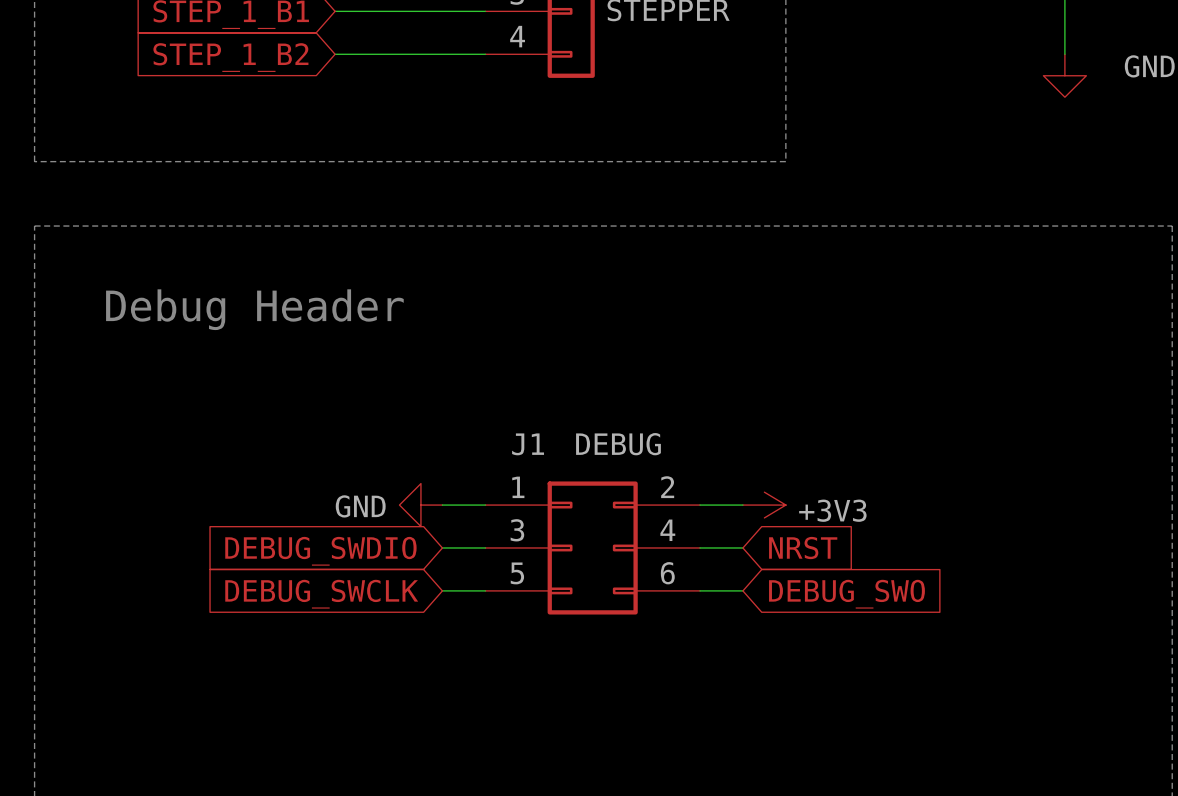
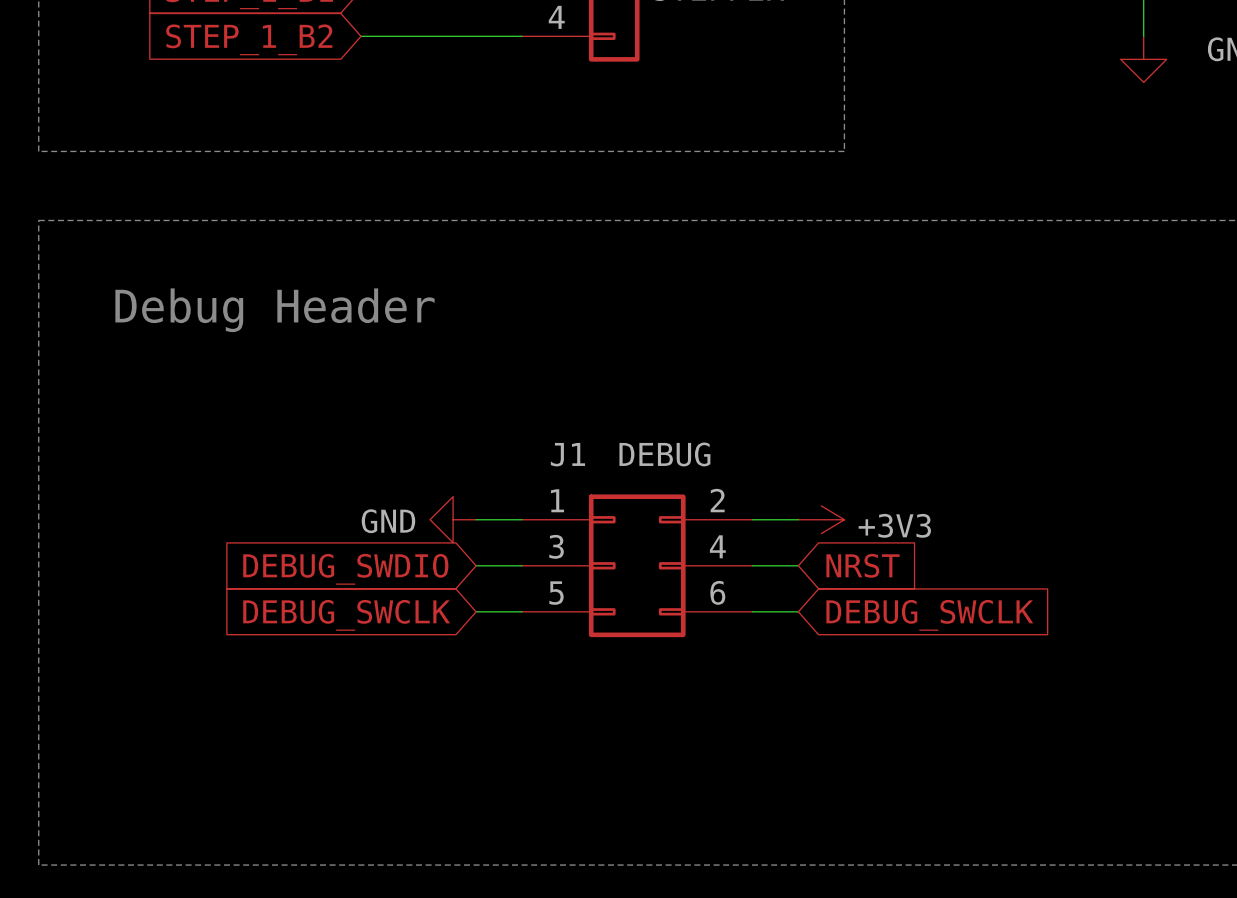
global label: DEBUG_SWO (846, 594) -> DEBUG_SWCLK (929, 615)

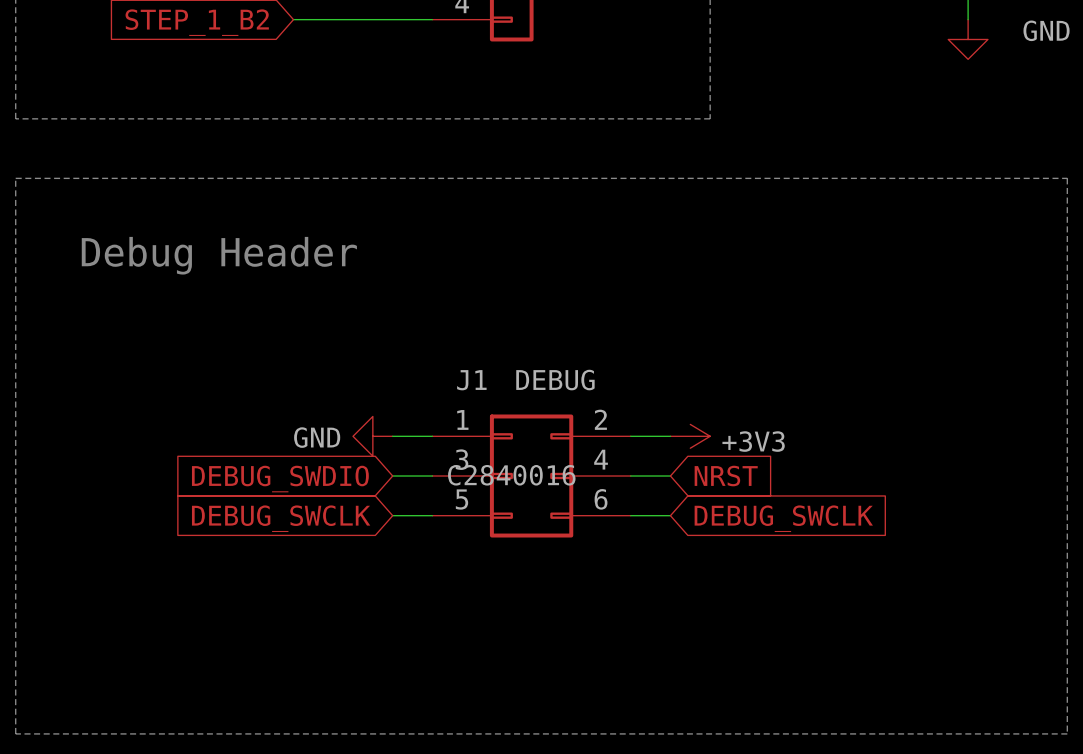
J1 text: none -> C2840016 (511, 475)

